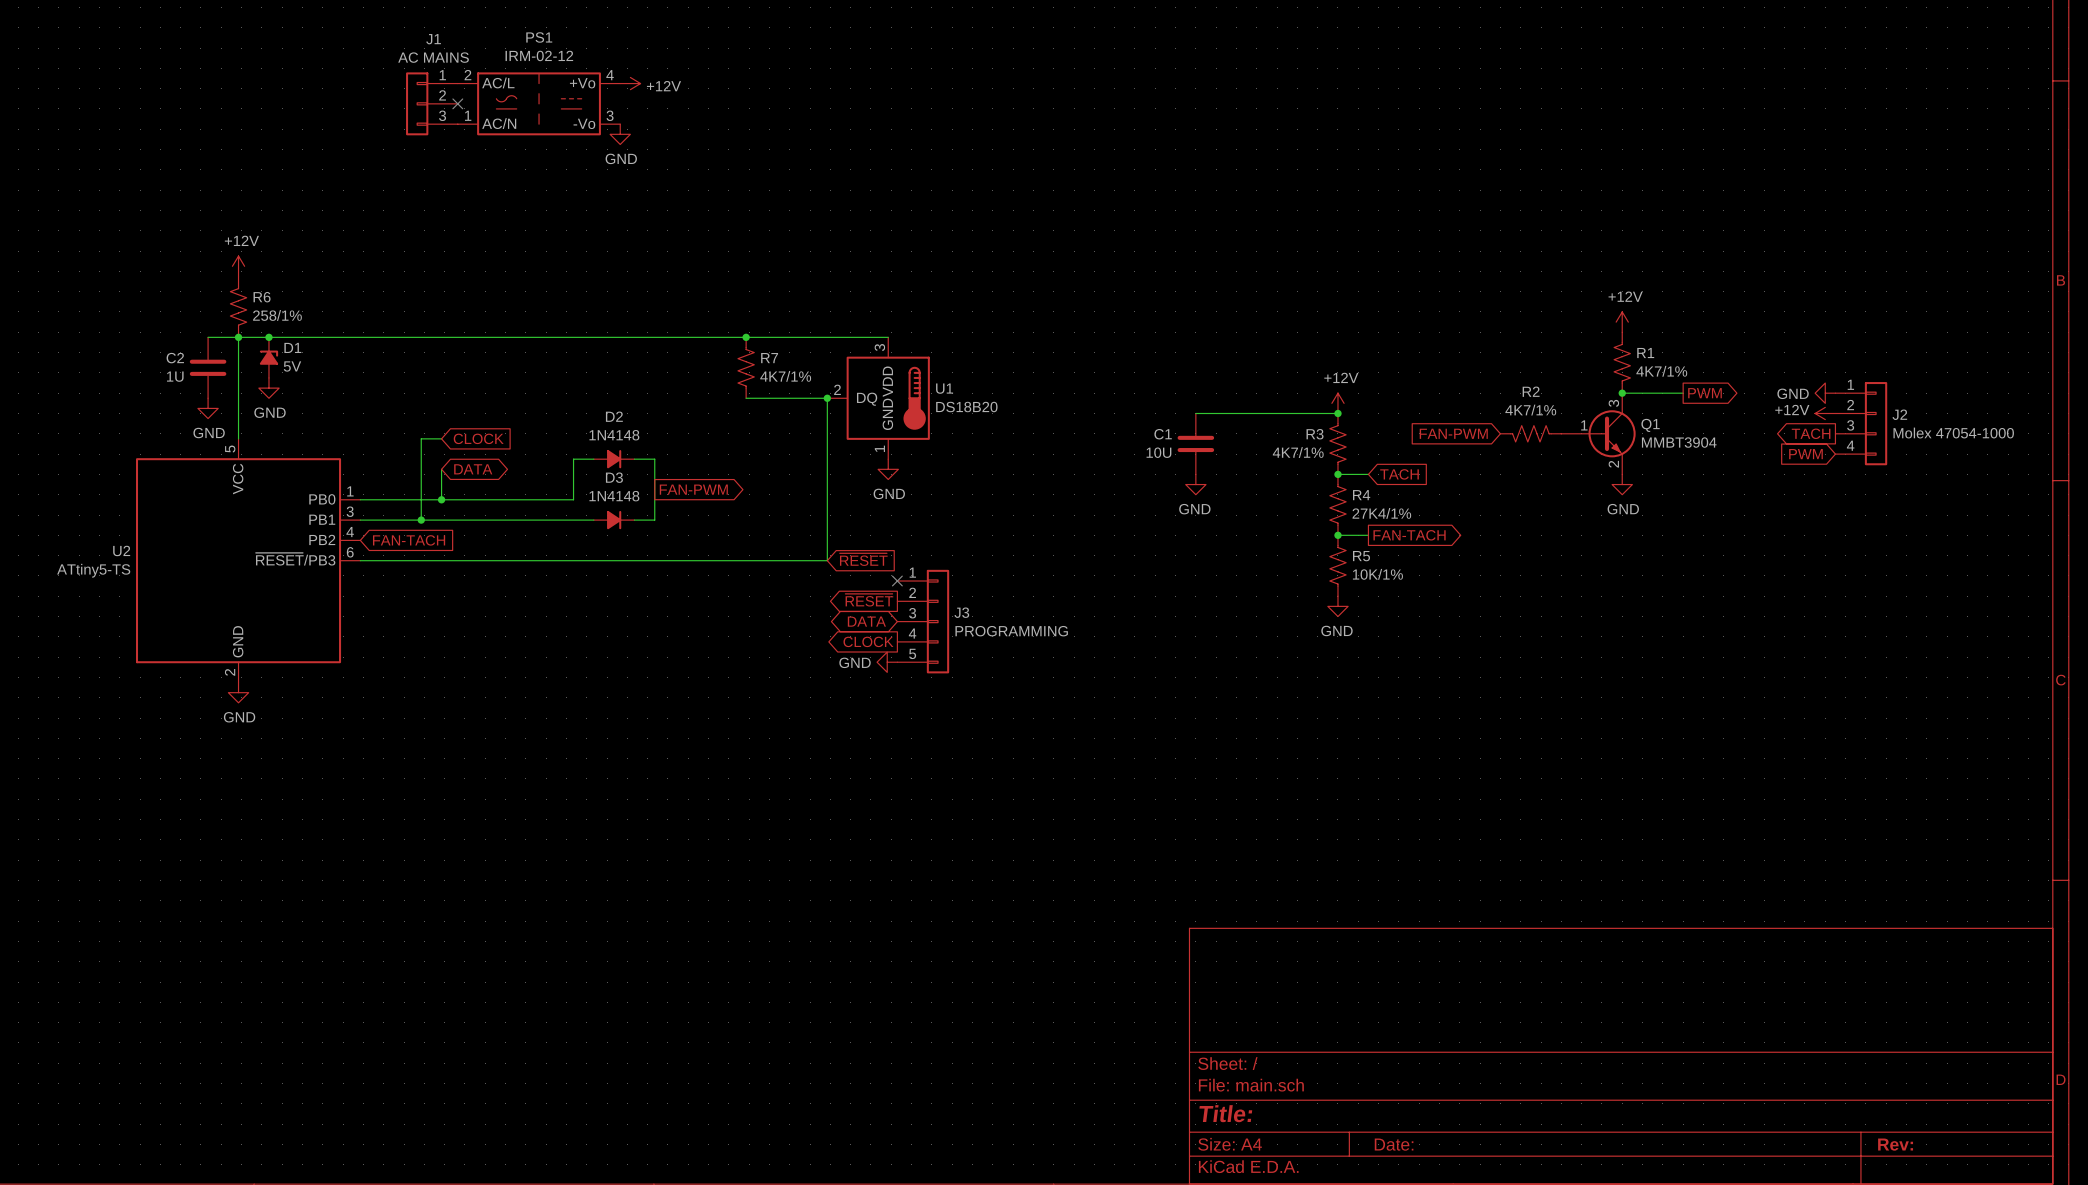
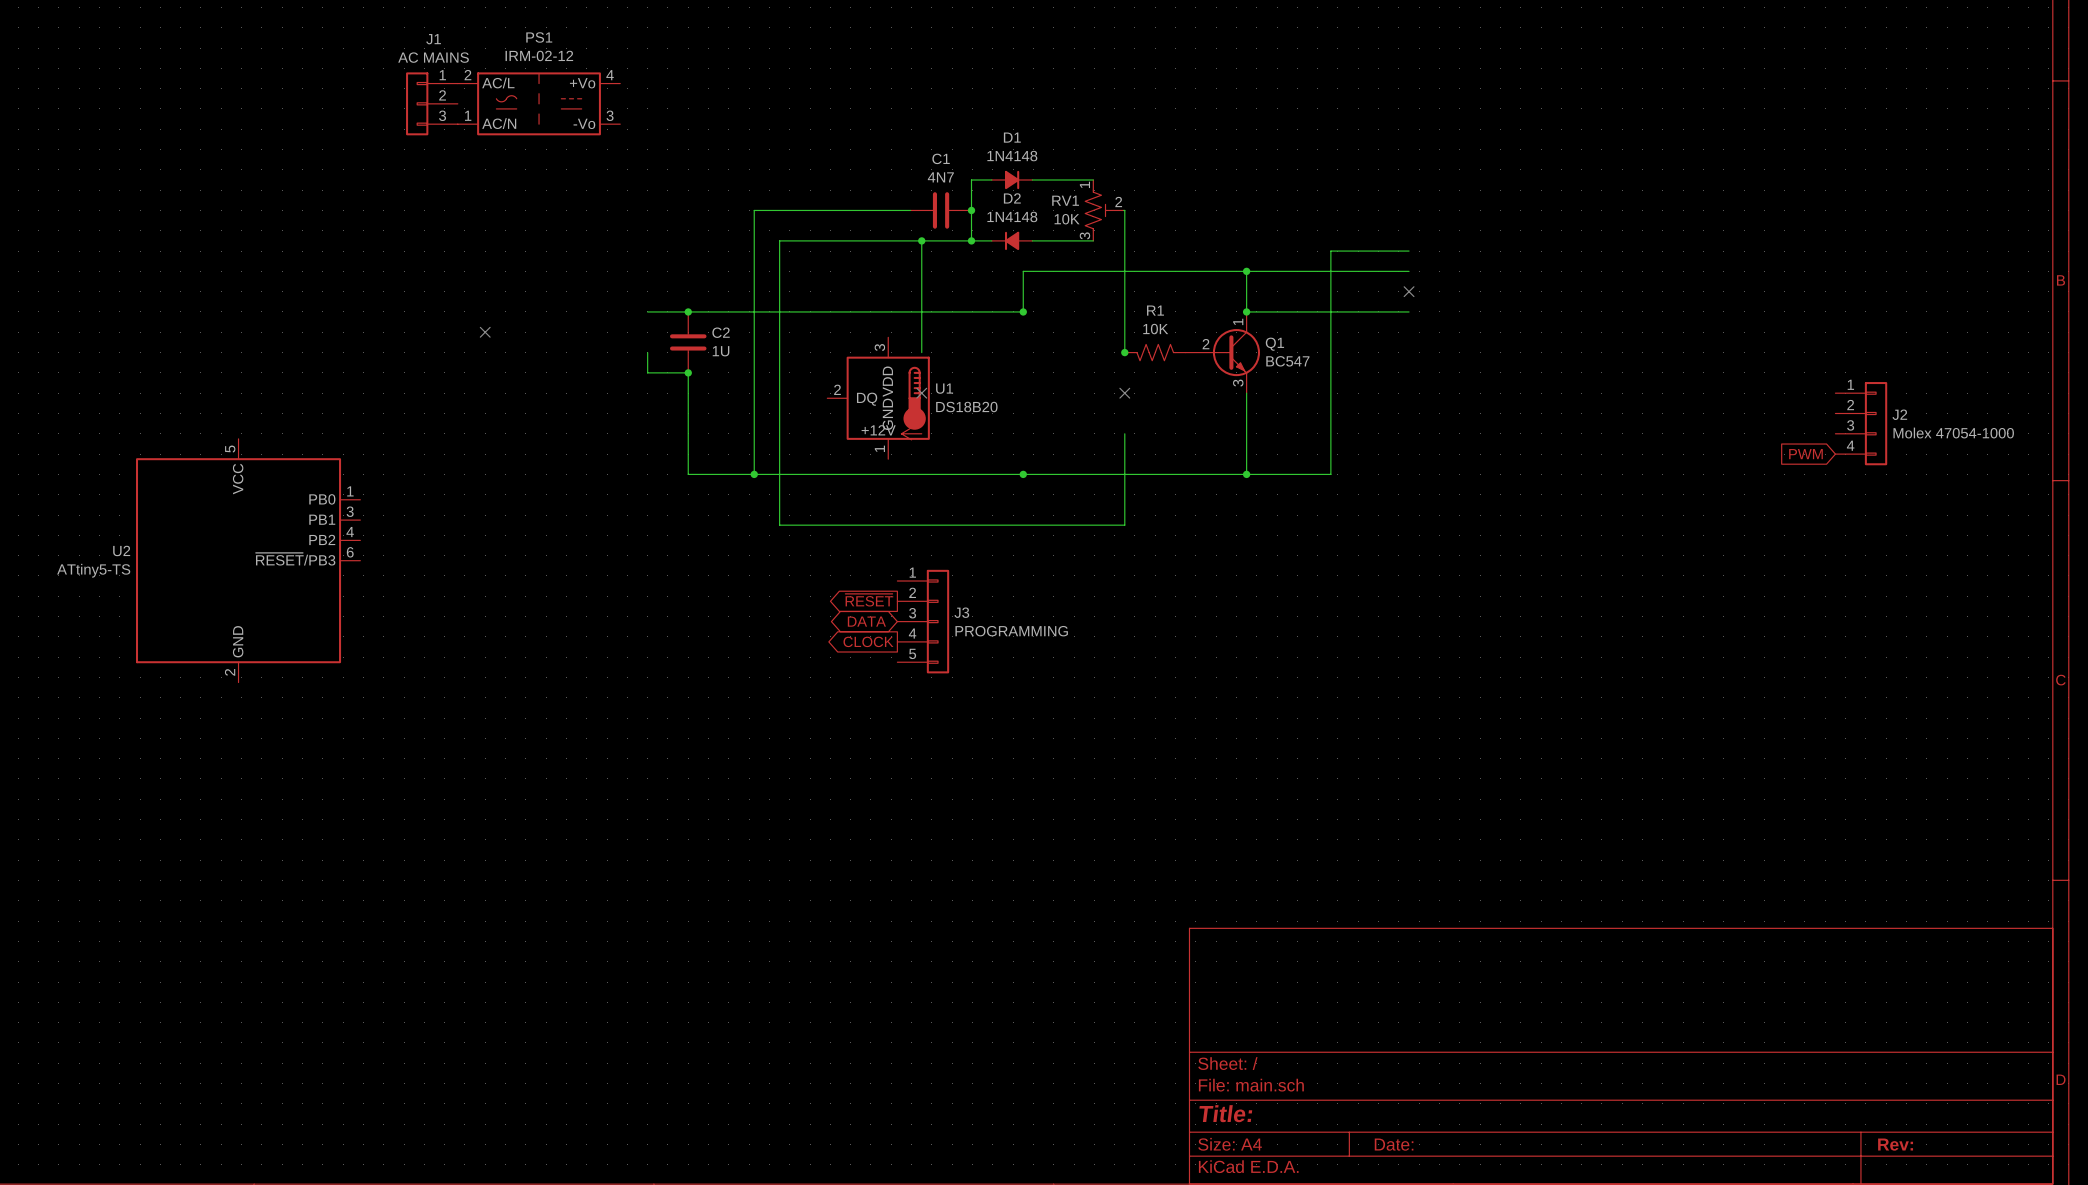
power symbol: +12V (630, 83) -> none
no-connect mark: (457, 103) -> none
power symbol: GND (620, 134) -> none
wire: none -> (991, 180) (971, 180) (971, 240)
wire: none -> (1032, 180) (1093, 180)
wire: none -> (910, 210) (754, 210) (754, 474)
junction: none -> (971, 210)
RV1: none -> 10K (1104, 210)
wire: none -> (1123, 210) (1124, 352)
wire: none -> (921, 240) (921, 352)
junction: none -> (921, 240)
junction: none -> (971, 240)
wire: none -> (991, 240) (779, 240) (779, 525) (1124, 525) (1124, 433)
wire: none -> (1032, 240) (1093, 240)
wire: none -> (1409, 251) (1330, 251) (1330, 474) (688, 474) (688, 372) (647, 372) (647, 352)
power symbol: +12V (238, 266) -> none
wire: none -> (1246, 271) (1246, 311) (1409, 311)
junction: none -> (1246, 271)
wire: none -> (1409, 271) (1023, 271) (1023, 311) (647, 311)
no-connect mark: none -> (1409, 291)
R6: 258/1% (238, 306) -> none
junction: none -> (688, 311)
junction: none -> (1023, 311)
junction: none -> (1246, 311)
power symbol: +12V (1622, 322) -> none
no-connect mark: none -> (485, 332)
wire: (208, 337) (888, 337) -> none
wire: (238, 337) (238, 438) -> none
junction: (238, 337) -> none
D1 symbol: [259, 337, 279, 378] -> [991, 170, 1033, 190]
junction: (268, 337) -> none
junction: (746, 337) -> none
D1 name position: D1 (292, 347) -> D1 (1012, 137)
junction: none -> (1124, 352)
R1 name position: R1 (1645, 353) -> R1 (1155, 310)
C2 name position: C2 (175, 358) -> C2 (721, 332)
R1 rotation: 0° (1622, 362) -> 90° clockwise (1155, 352)
R1 position: (1622, 362) -> (1155, 352)
D1 value: 5V (292, 366) -> 1N4148 (1012, 156)
C2 position: (208, 367) -> (688, 342)
R7: 4K7/1% (746, 367) -> none
R1 value: 4K7/1% (1661, 371) -> 10K (1155, 329)
junction: none -> (688, 372)
C2 value position: 1U (175, 376) -> 1U (721, 351)
power symbol: GND (268, 388) -> none
no-connect mark: none -> (921, 393)
no-connect mark: none -> (1124, 393)
wire: none -> (1246, 393) (1246, 474)
Q1 symbol: [1561, 393, 1636, 475] -> [1185, 311, 1261, 394]
wire: (1622, 393) (1683, 393) -> none
junction: (1622, 393) -> none
global label: PWM (1704, 393) -> none
power symbol: GND (1825, 393) -> none
wire: (746, 398) (827, 398) (827, 560) (360, 560) -> none
junction: (827, 398) -> none
power symbol: +12V (1337, 403) -> none
power symbol: GND (208, 408) -> none
wire: (1195, 413) (1337, 413) -> none
junction: (1337, 413) -> none
power symbol: +12V (1825, 413) -> none
power symbol: none -> +12V (911, 433)
global label: FAN-PWM (1453, 433) -> none
R2: 4K7/1% (1530, 433) -> none
global label: TACH (1811, 433) -> none
C1 name position: C1 (1163, 434) -> C1 (941, 158)
wire: (441, 438) (421, 438) (421, 520) -> none
global label: CLOCK (478, 438) -> none
Q1 value: MMBT3904 (1679, 442) -> BC547 (1287, 361)
C1 rotation: 0° (1195, 443) -> 90° clockwise (941, 210)
C1 position: (1195, 443) -> (941, 210)
R3: 4K7/1% (1337, 443) -> none
C1 value: 10U (1158, 452) -> 4N7 (940, 177)
wire: (593, 459) (573, 459) (573, 499) (360, 499) -> none
D2 rotation: 0° (614, 459) -> 180° (1012, 240)
D2 position: (614, 459) -> (1012, 240)
wire: (634, 459) (654, 459) (654, 520) (634, 520) -> none
wire: (441, 469) (441, 499) -> none
global label: DATA (473, 469) -> none
power symbol: GND (888, 469) -> none
junction: none -> (754, 474)
junction: none -> (1023, 474)
junction: none -> (1246, 474)
wire: (1337, 474) (1368, 474) -> none
junction: (1337, 474) -> none
global label: TACH (1399, 474) -> none
power symbol: GND (1195, 484) -> none
power symbol: GND (1622, 484) -> none
global label: FAN-PWM (693, 489) -> none
junction: (441, 499) -> none
R4: 27K4/1% (1337, 504) -> none
wire: (360, 520) (593, 520) -> none
junction: (421, 520) -> none
D3: 1N4148 (614, 520) -> none
wire: (1337, 535) (1368, 535) -> none
junction: (1337, 535) -> none
global label: FAN-TACH (1409, 535) -> none
global label: FAN-TACH (409, 540) -> none
global label: ~{RESET} (863, 559) -> none
R5: 10K/1% (1337, 565) -> none
no-connect mark: (897, 581) -> none
power symbol: GND (1337, 606) -> none
power symbol: GND (887, 662) -> none
power symbol: GND (238, 692) -> none

